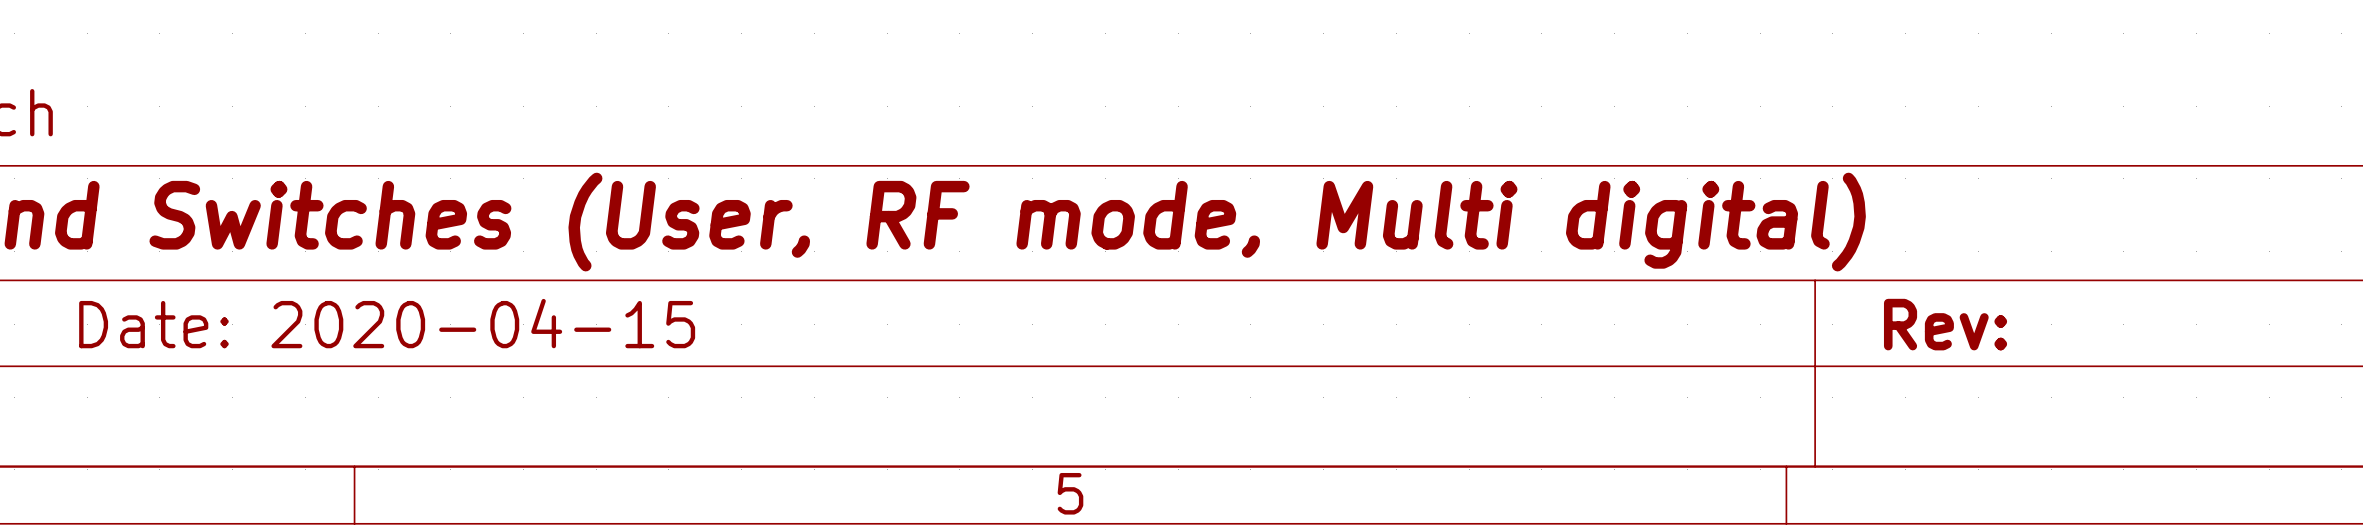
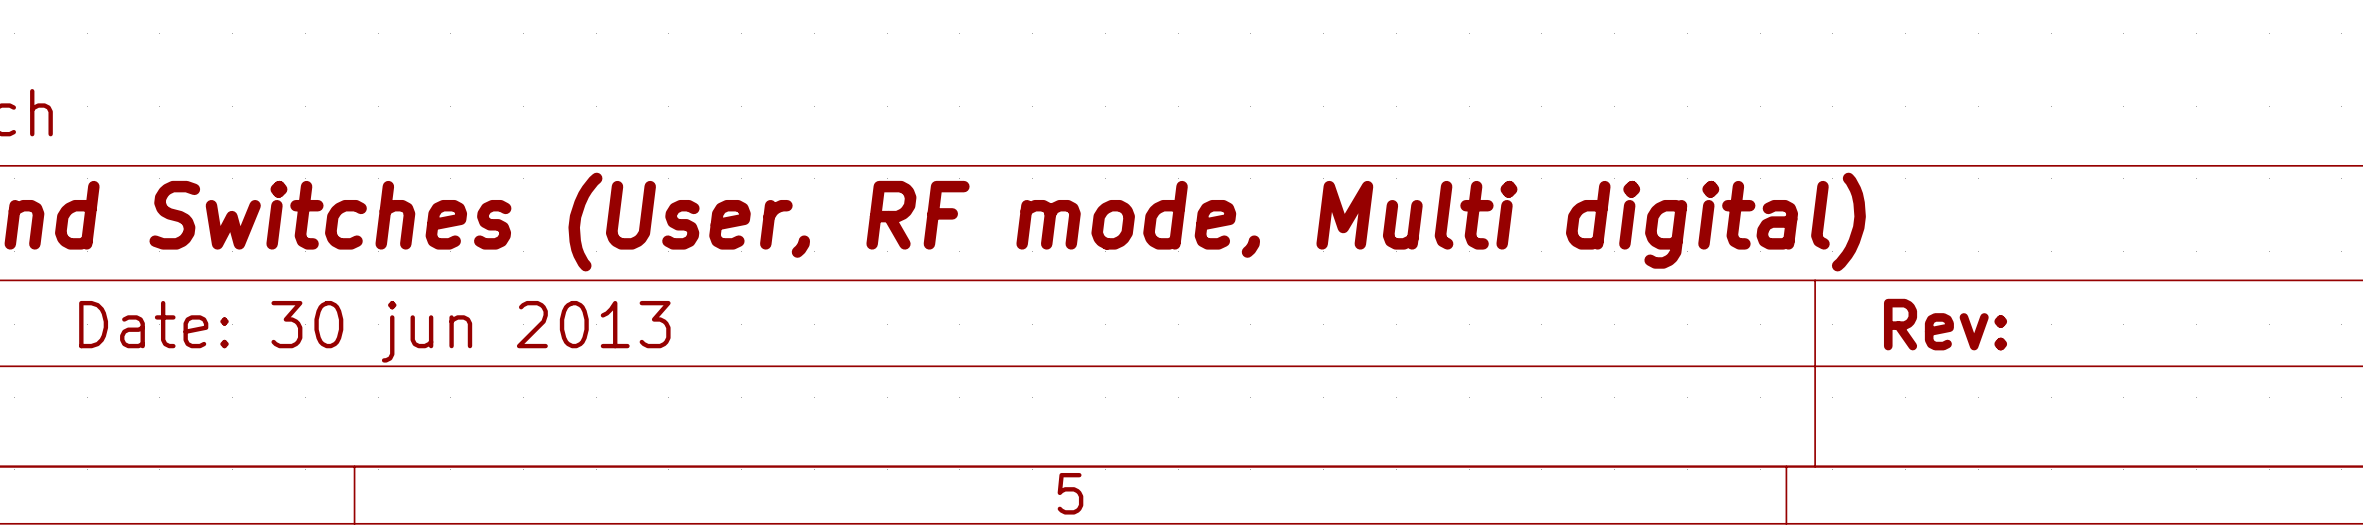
title block: Date: 2020-04-15 (387, 323) -> Date: 30 jun 2013 (374, 331)

